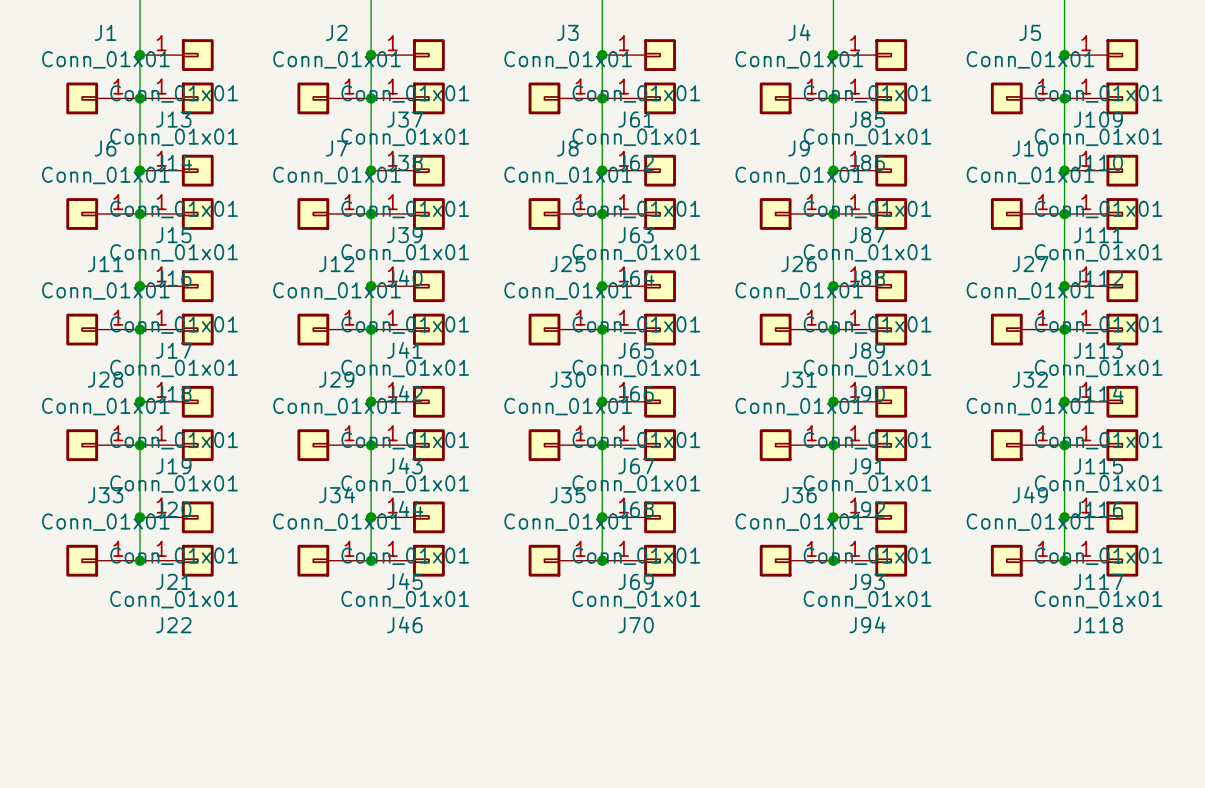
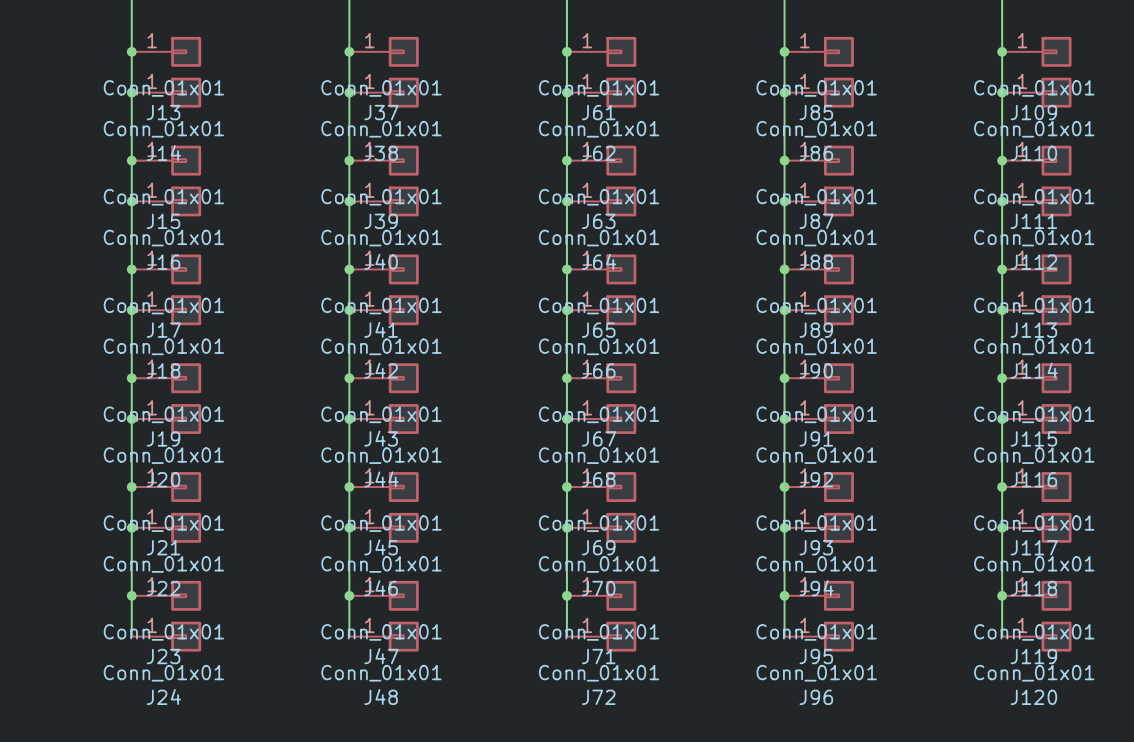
J1: Conn_01x01 (103, 98) -> none
J2: Conn_01x01 (334, 98) -> none
J3: Conn_01x01 (565, 98) -> none
J4: Conn_01x01 (796, 98) -> none
J5: Conn_01x01 (1027, 98) -> none
J6: Conn_01x01 (103, 214) -> none
J7: Conn_01x01 (334, 214) -> none
J8: Conn_01x01 (565, 214) -> none
J9: Conn_01x01 (796, 214) -> none
J10: Conn_01x01 (1027, 214) -> none
J11: Conn_01x01 (103, 329) -> none
J12: Conn_01x01 (334, 329) -> none
J25: Conn_01x01 (565, 329) -> none
J26: Conn_01x01 (796, 329) -> none
J27: Conn_01x01 (1027, 329) -> none
J28: Conn_01x01 (103, 445) -> none
J29: Conn_01x01 (334, 445) -> none
J30: Conn_01x01 (565, 445) -> none
J31: Conn_01x01 (796, 445) -> none
J32: Conn_01x01 (1027, 445) -> none
J33: Conn_01x01 (103, 560) -> none
wire: none -> (131, 527) (131, 636)
J34: Conn_01x01 (334, 560) -> none
wire: none -> (349, 527) (349, 636)
J35: Conn_01x01 (565, 560) -> none
wire: none -> (566, 527) (566, 636)
J36: Conn_01x01 (796, 560) -> none
wire: none -> (784, 527) (784, 636)
J49: Conn_01x01 (1027, 560) -> none
wire: none -> (1002, 527) (1002, 636)
junction: none -> (131, 595)
J23: none -> Conn_01x01 (166, 595)
junction: none -> (349, 595)
J47: none -> Conn_01x01 (384, 595)
junction: none -> (566, 595)
J71: none -> Conn_01x01 (601, 595)
junction: none -> (784, 595)
J95: none -> Conn_01x01 (819, 595)
junction: none -> (1002, 595)
J119: none -> Conn_01x01 (1036, 595)
J24: none -> Conn_01x01 (166, 636)
J48: none -> Conn_01x01 (384, 636)
J72: none -> Conn_01x01 (601, 636)
J96: none -> Conn_01x01 (819, 636)
J120: none -> Conn_01x01 (1036, 636)

